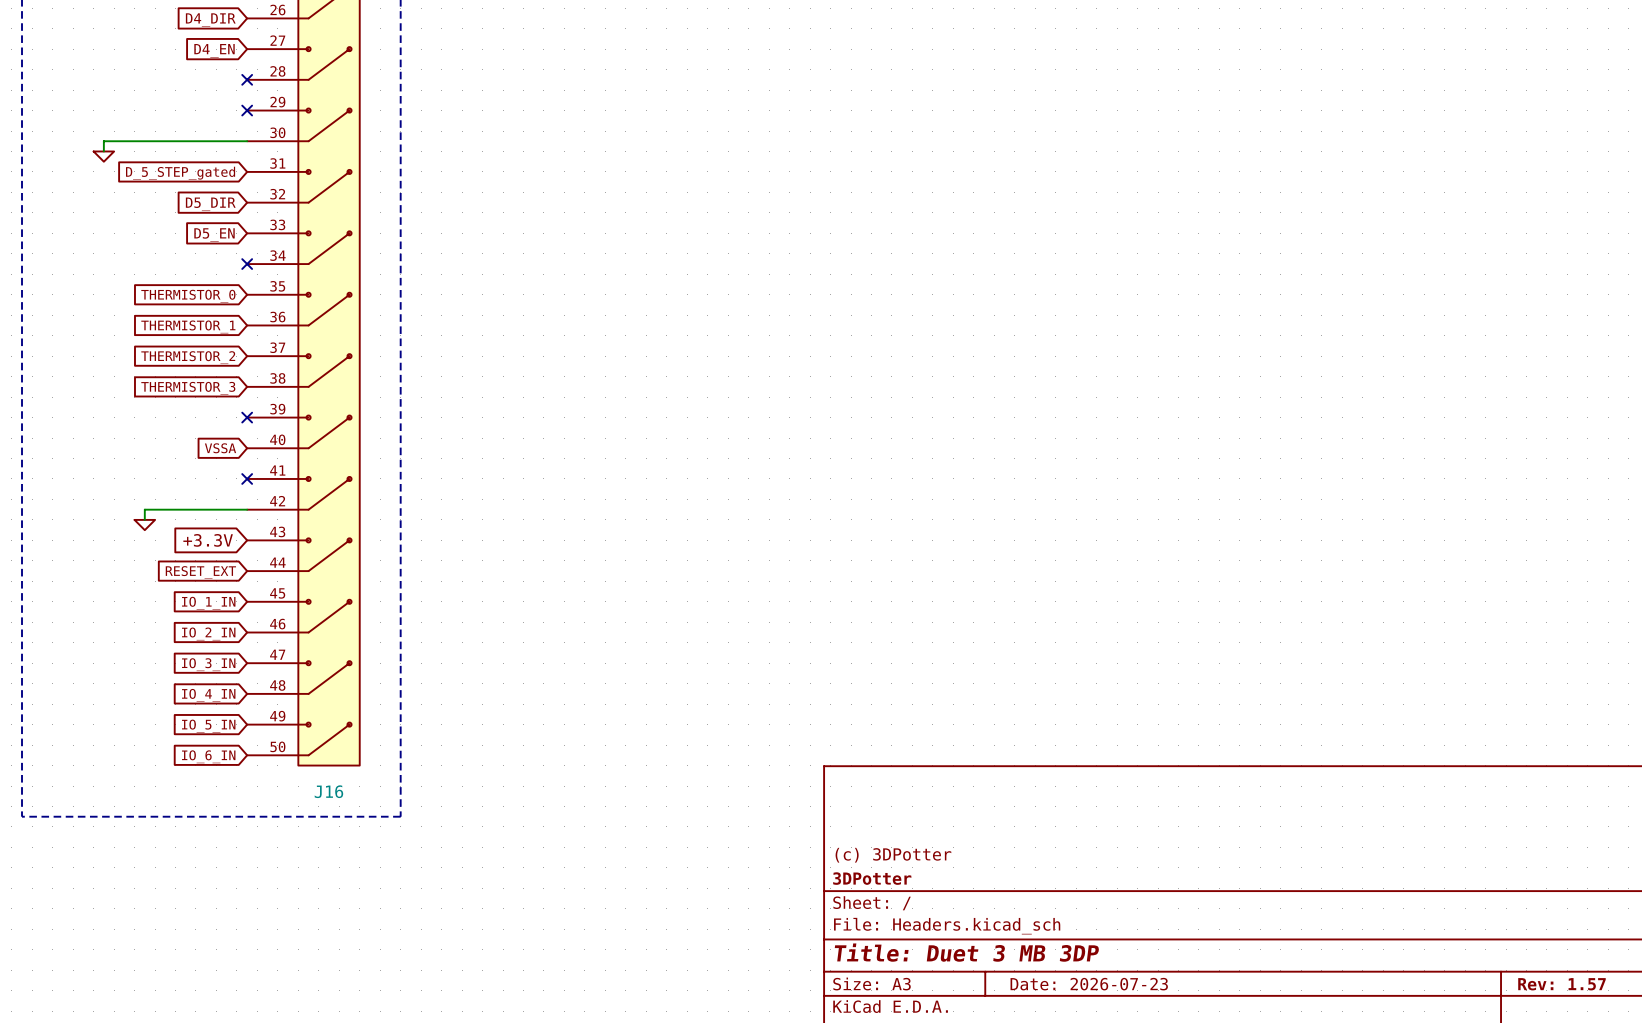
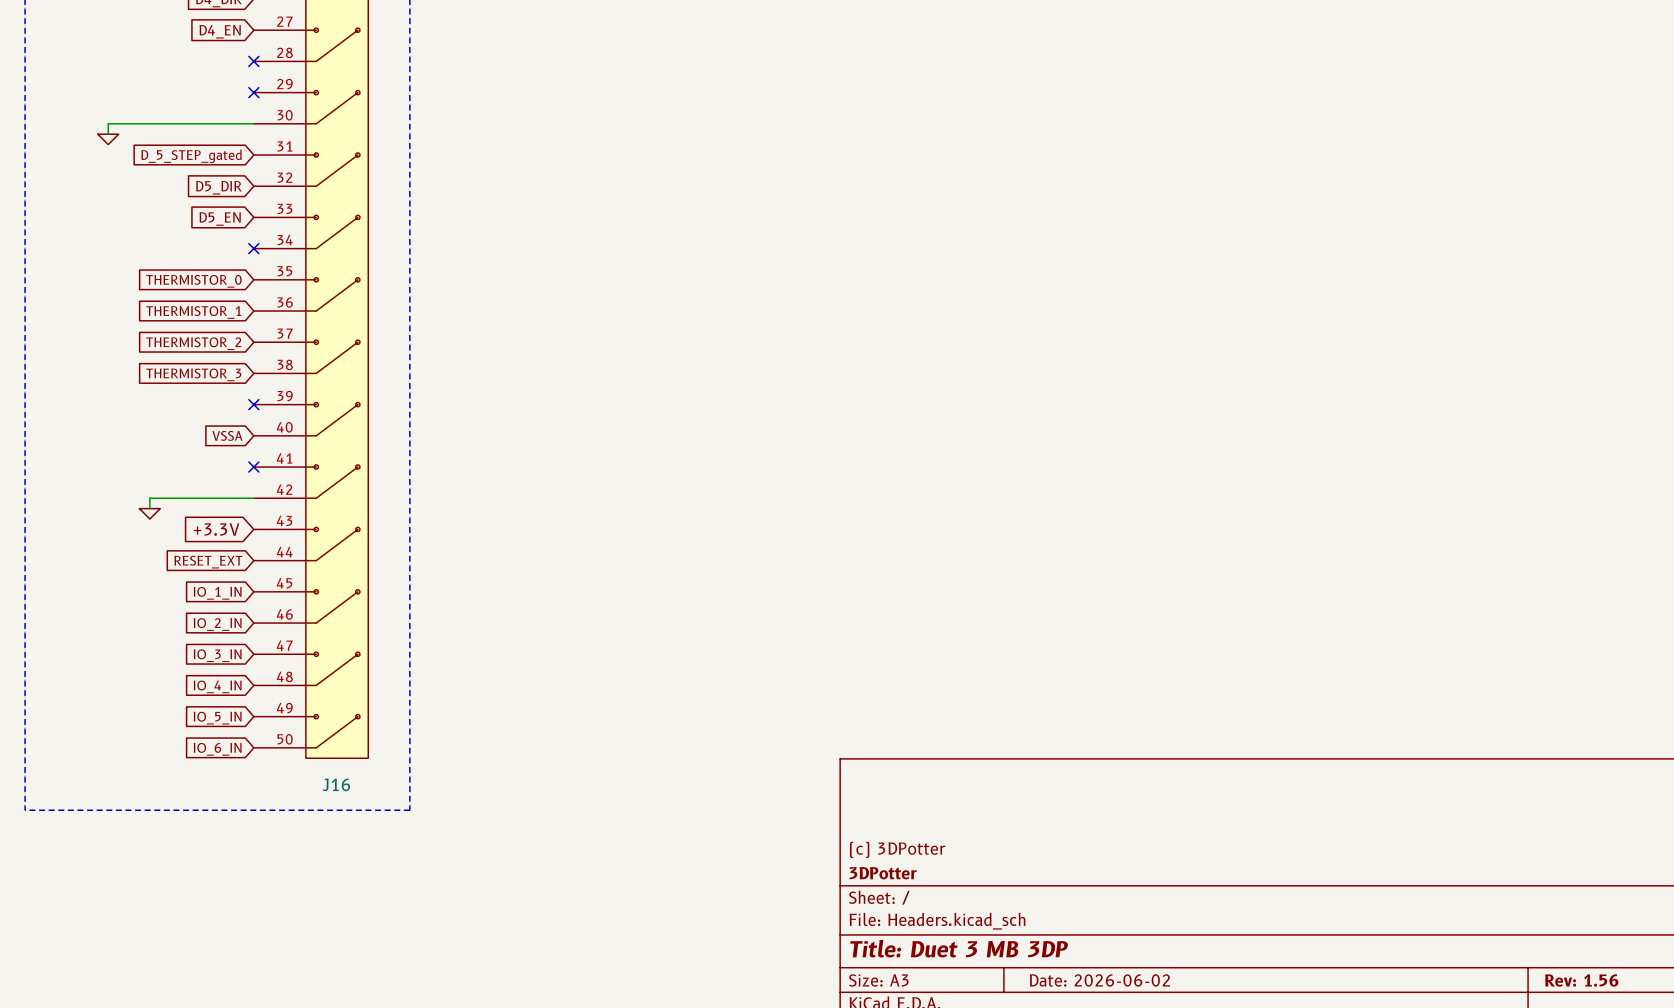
title block: Date: 2026-07-23 (1089, 984) -> Date: 2026-06-02 (1099, 980)
title block: Rev: 1.57 (1561, 984) -> Rev: 1.56 (1581, 980)

